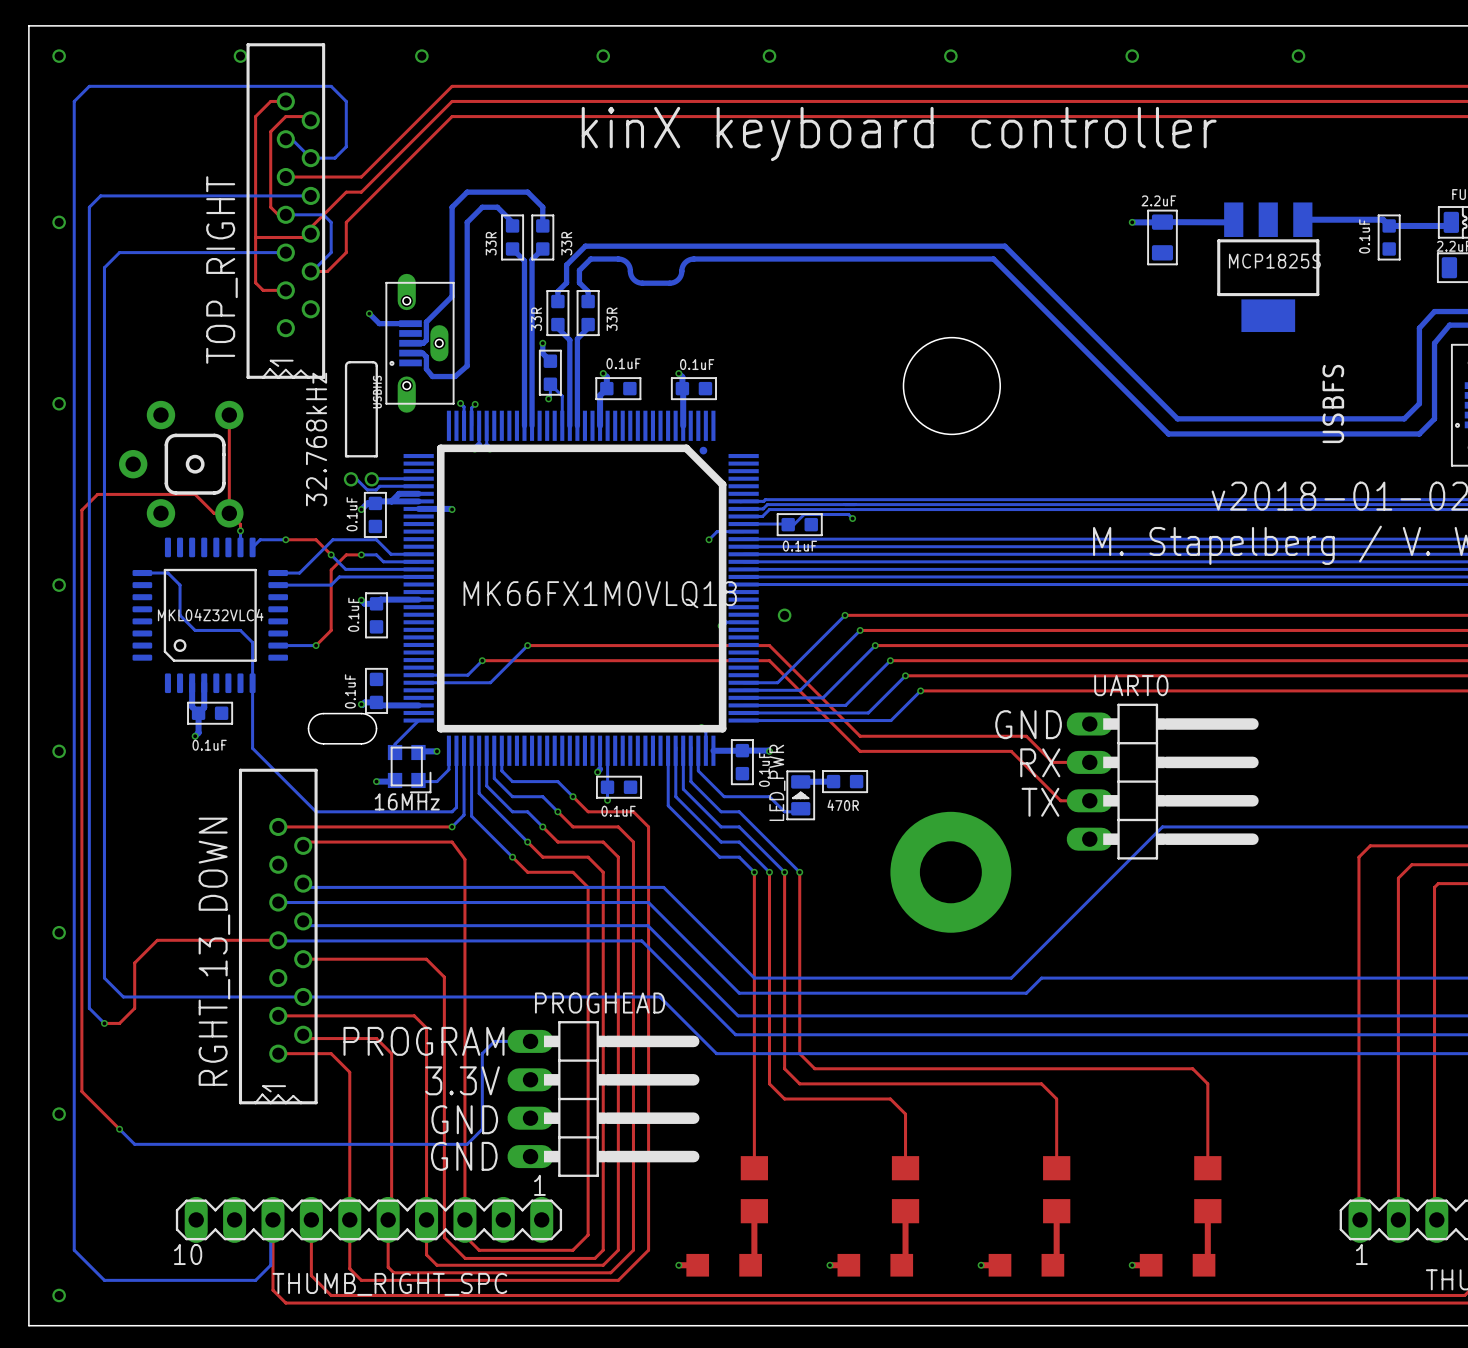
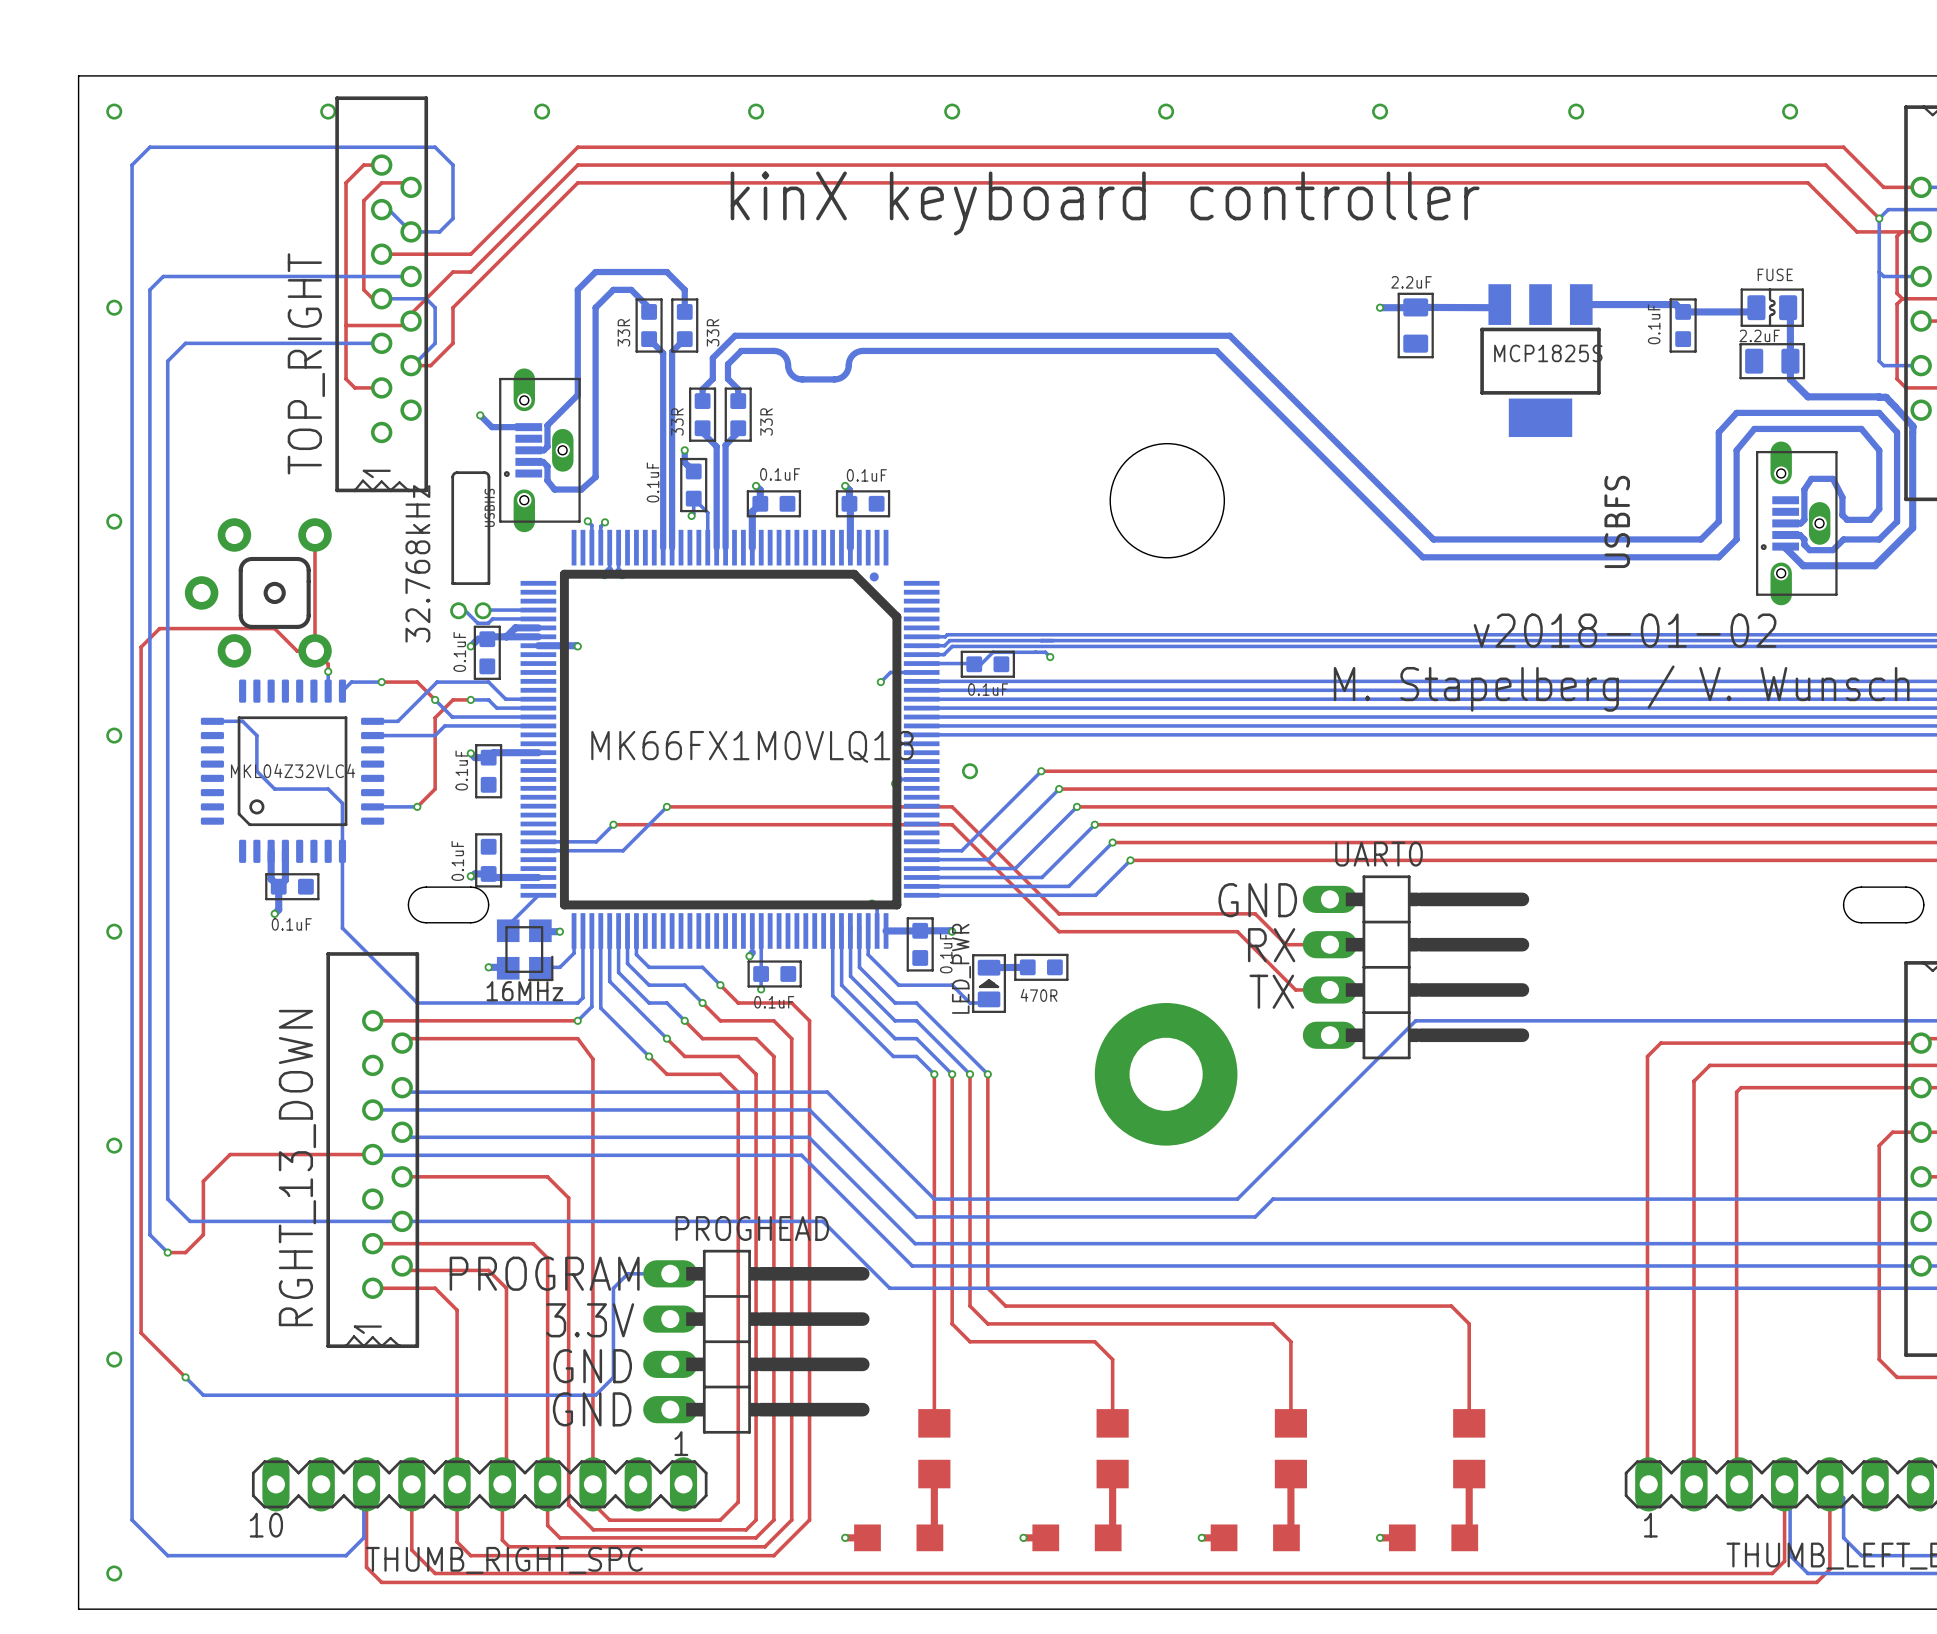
part value: none -> 0.1uF (653, 482)
part footprint: [387, 744, 432, 794] -> [496, 919, 554, 982]

